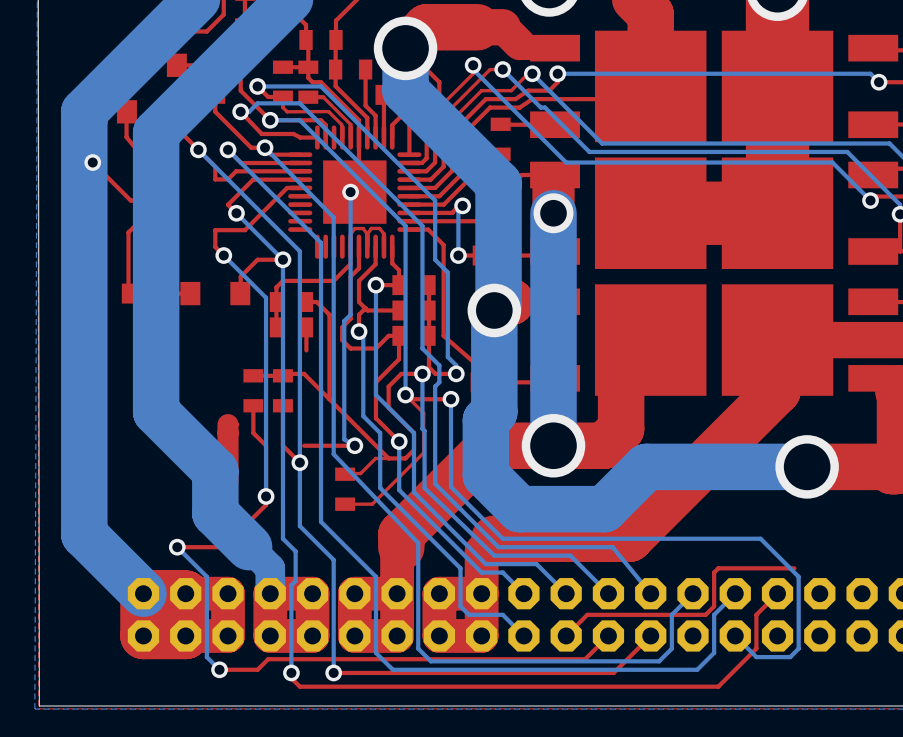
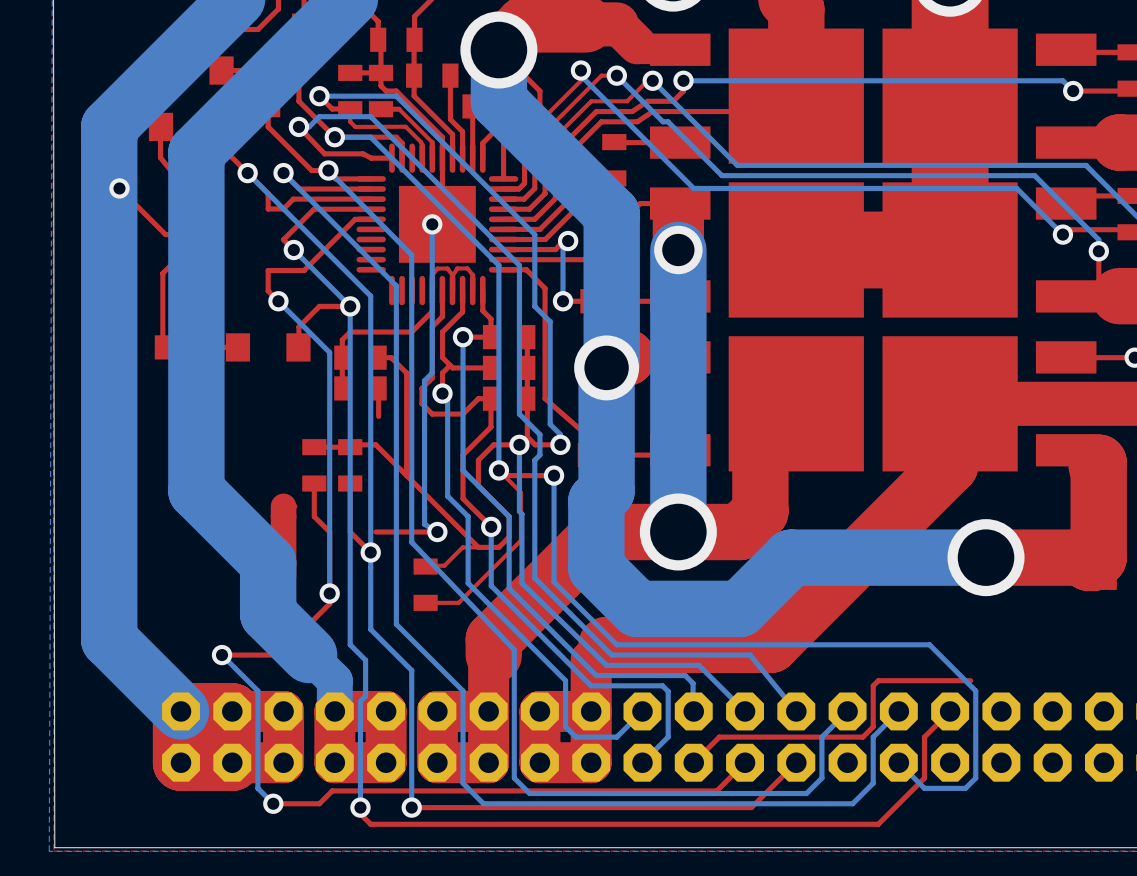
bottom track: (536, 564) (565, 593) -> (657, 675) (685, 675) (693, 683) (693, 710)
bottom track: (502, 572) (523, 593) -> (616, 737) (642, 711)
bottom track: (502, 614) (523, 635) -> (616, 685) (662, 685) (668, 691) (668, 737) (642, 762)

